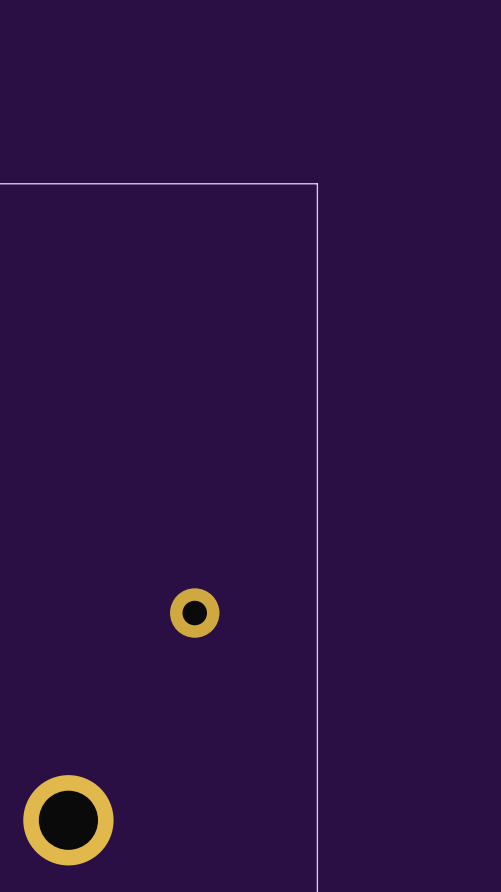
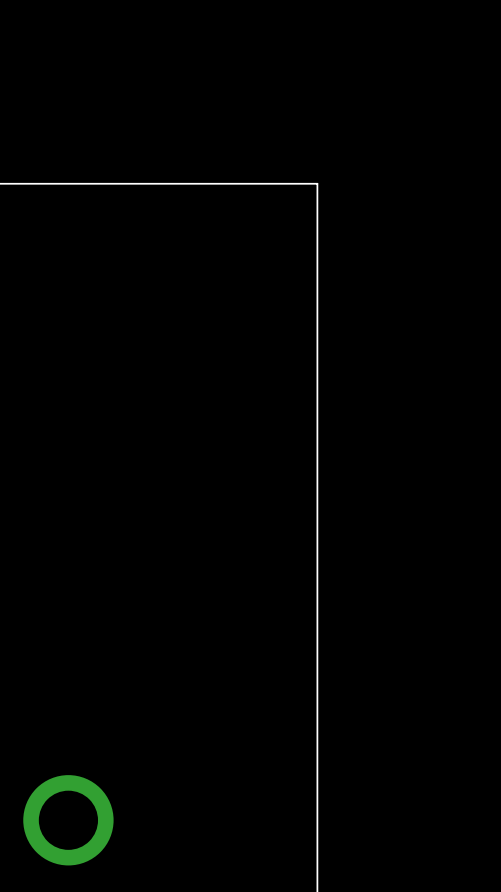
via: (194, 613) -> none

